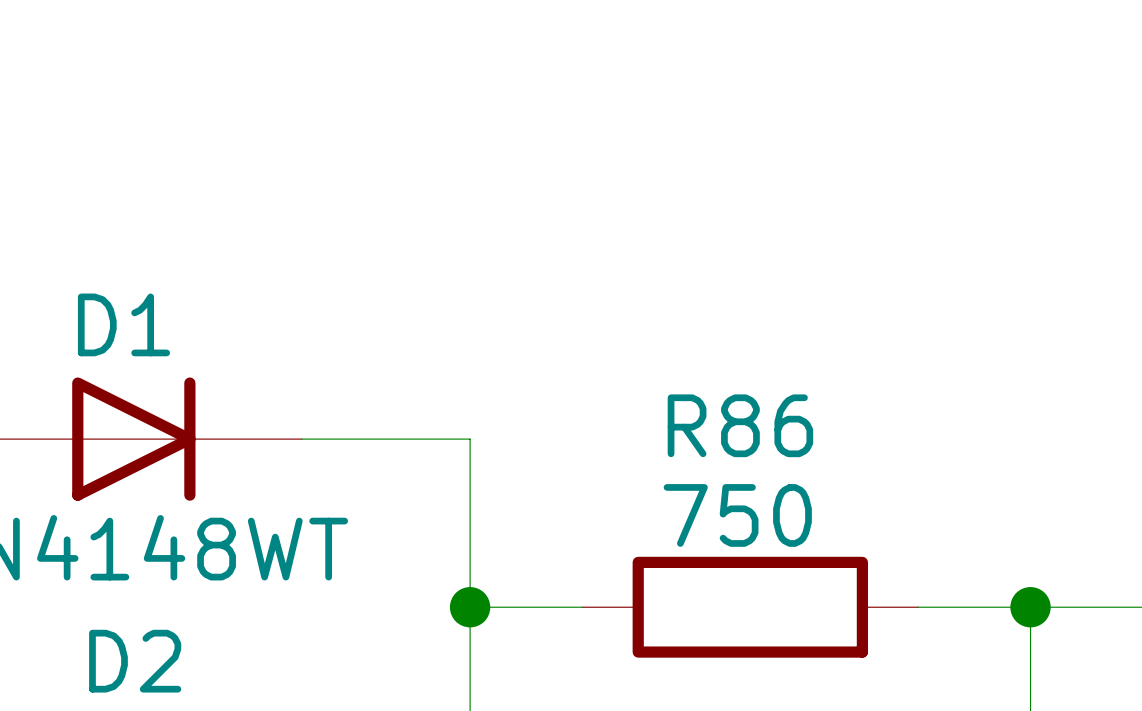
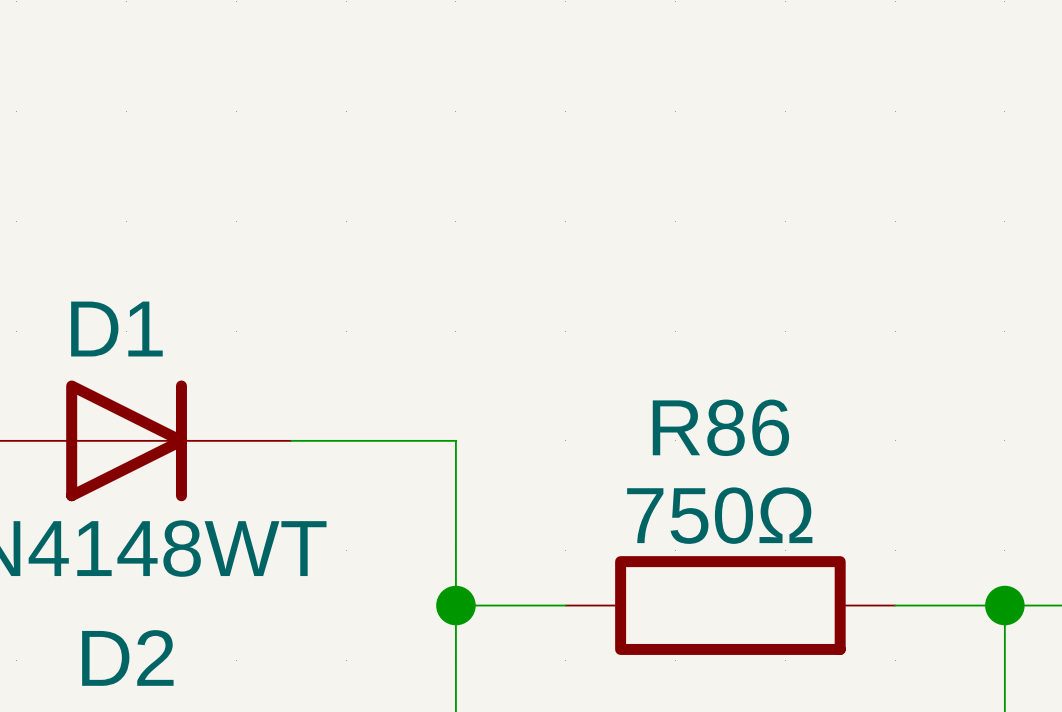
R86 value: 750 (737, 515) -> 750Ω (719, 515)

